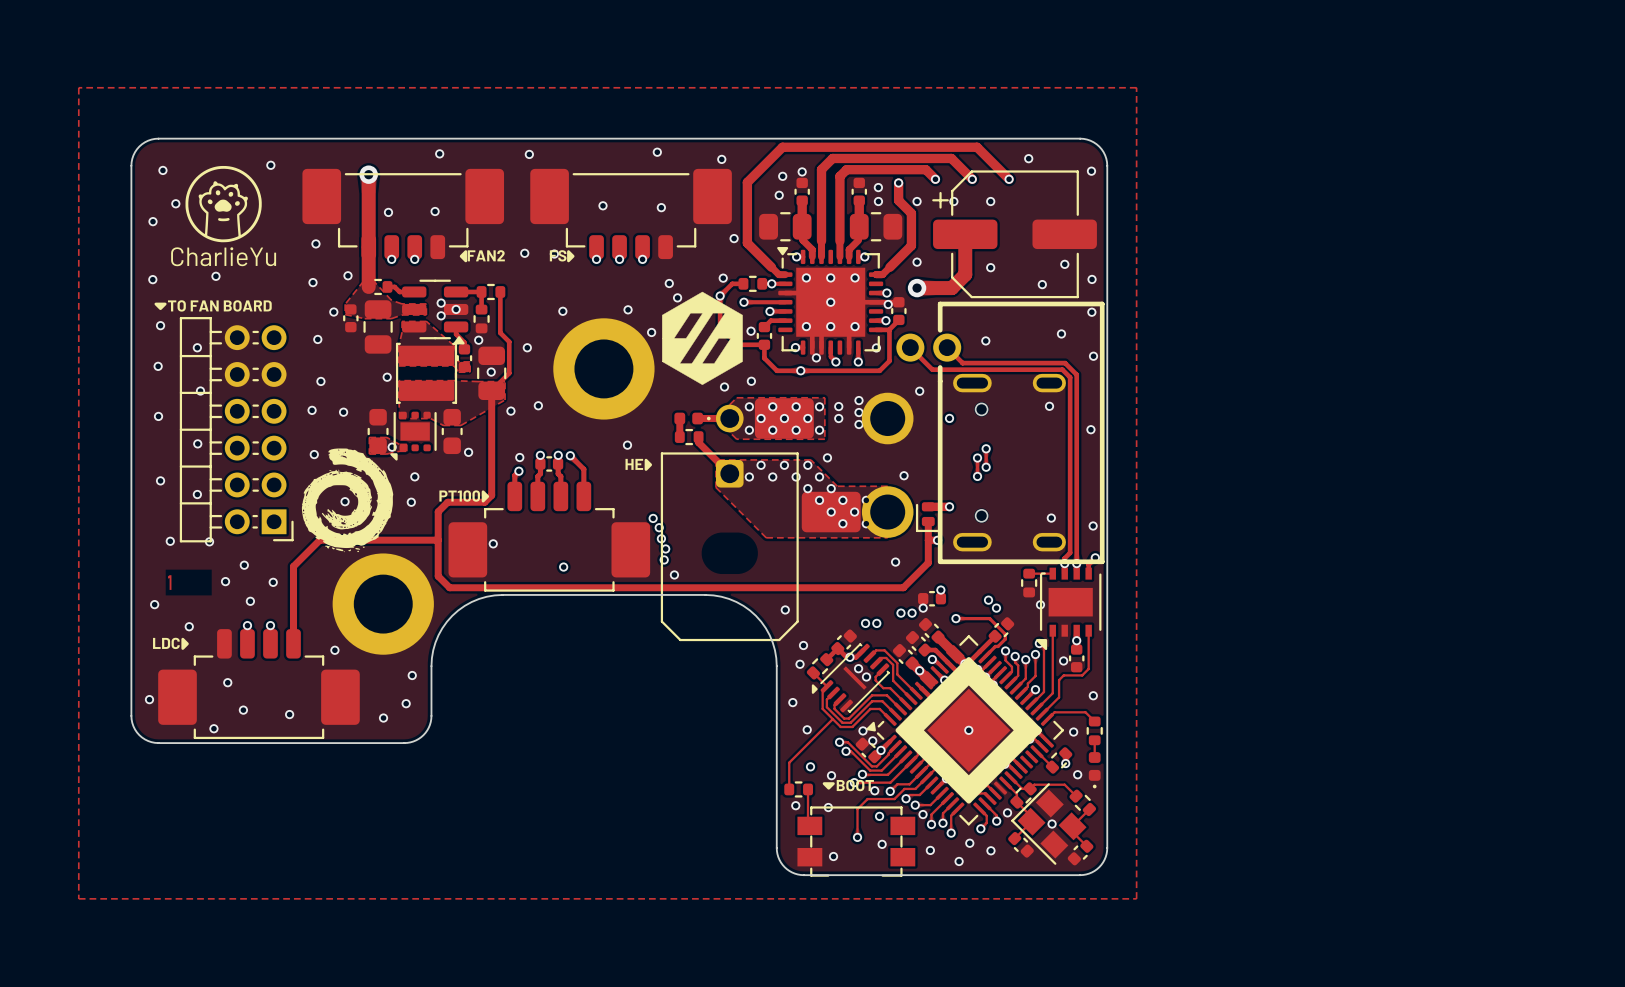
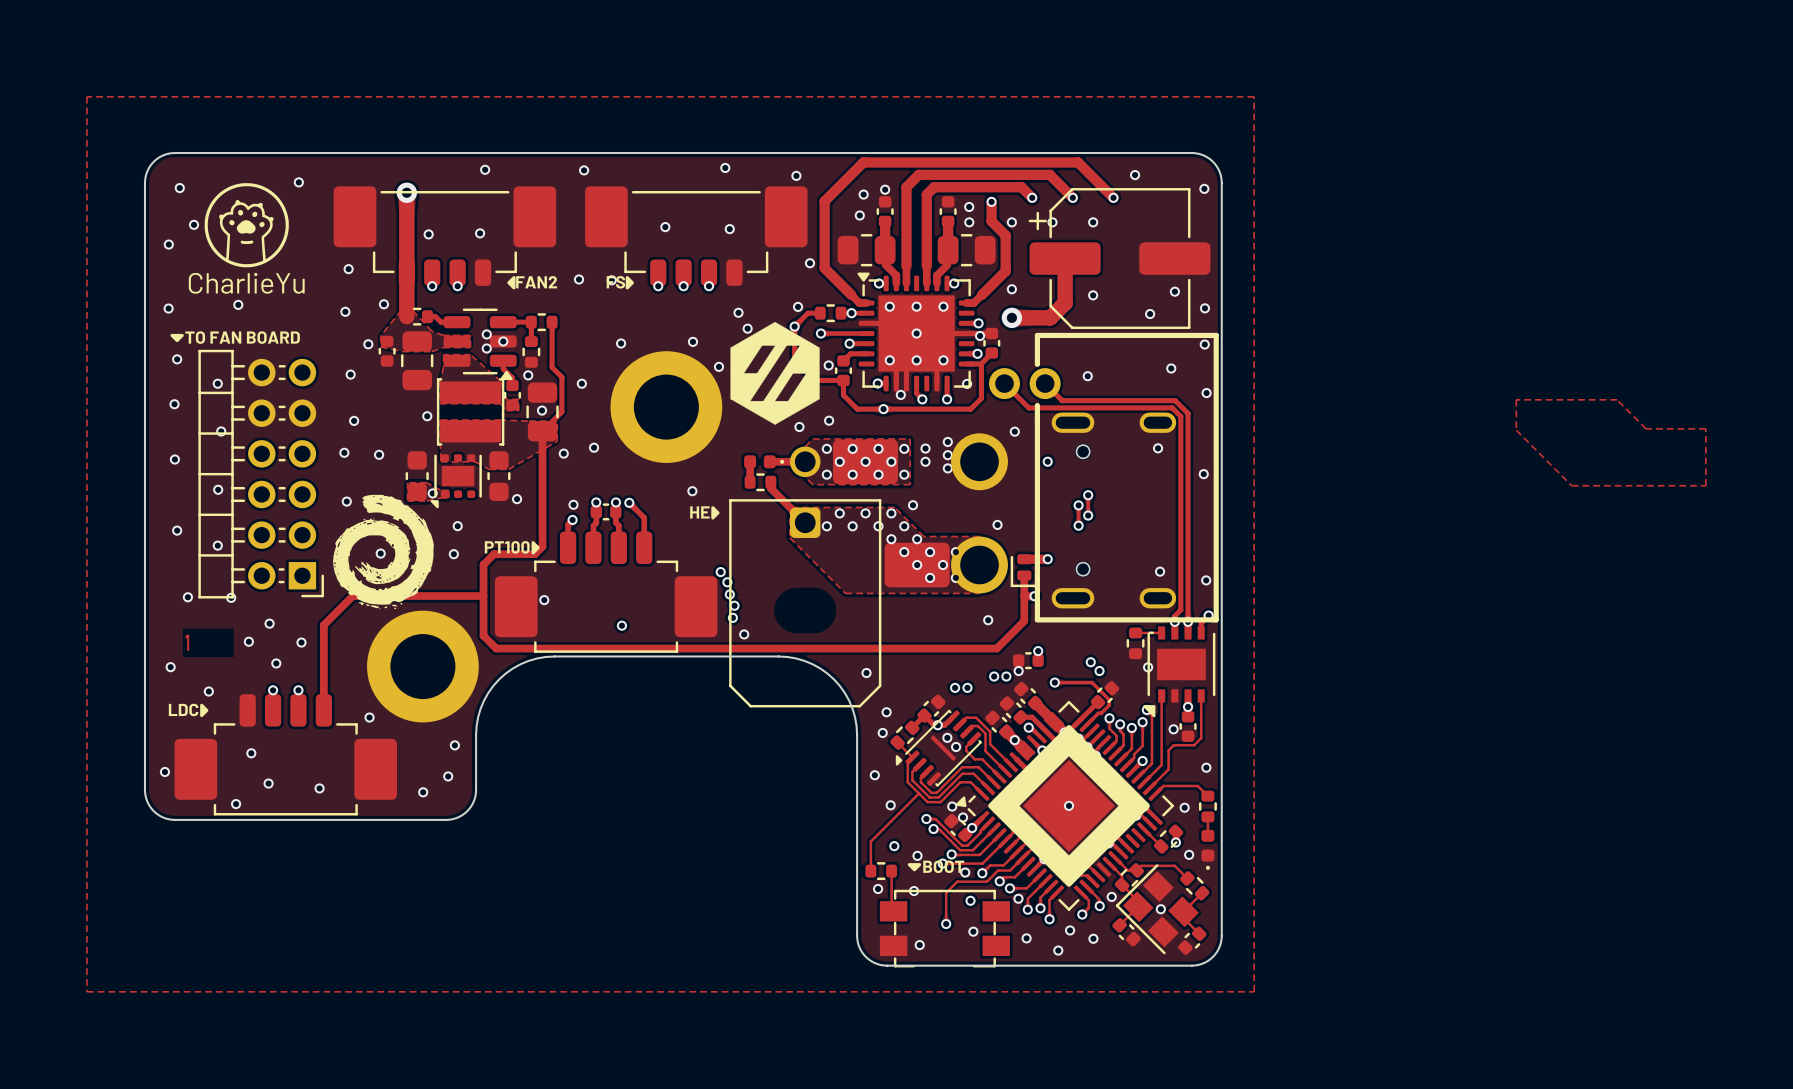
zone outline: none -> (1516, 399) (1617, 399) (1646, 428) (1705, 428) (1705, 485) (1571, 485) (1516, 430) (1516, 399)

